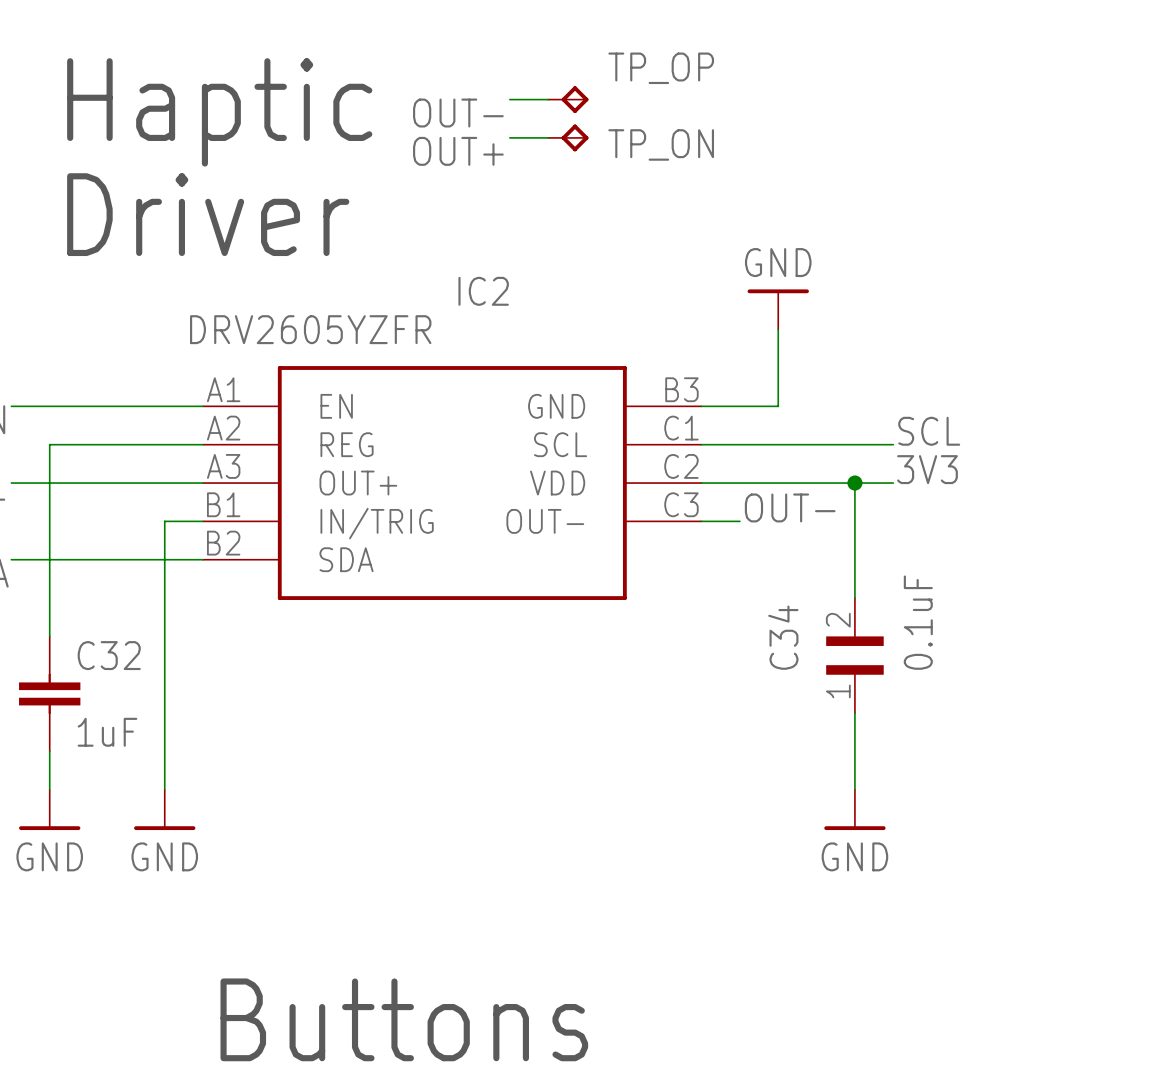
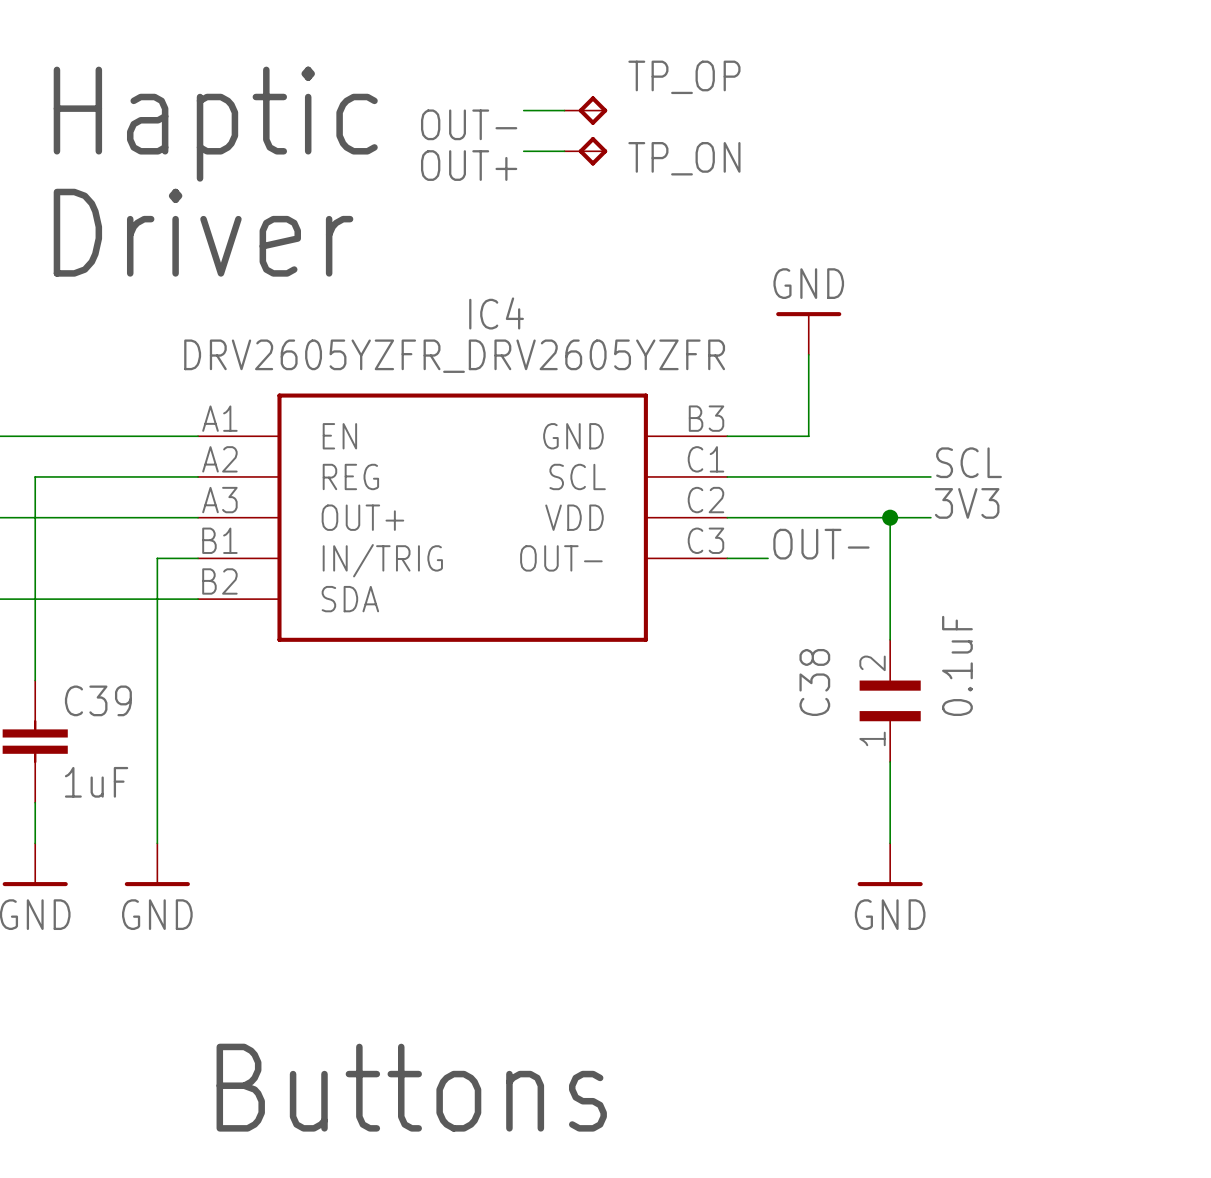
IC2 name: IC2 (483, 291) -> IC4 (496, 313)
IC2 value: DRV2605YZFR (310, 329) -> DRV2605YZFR_DRV2605YZFR (454, 356)
C34 name: C34 (783, 637) -> C38 (814, 682)
C32 name: C32 (109, 655) -> C39 (98, 700)

